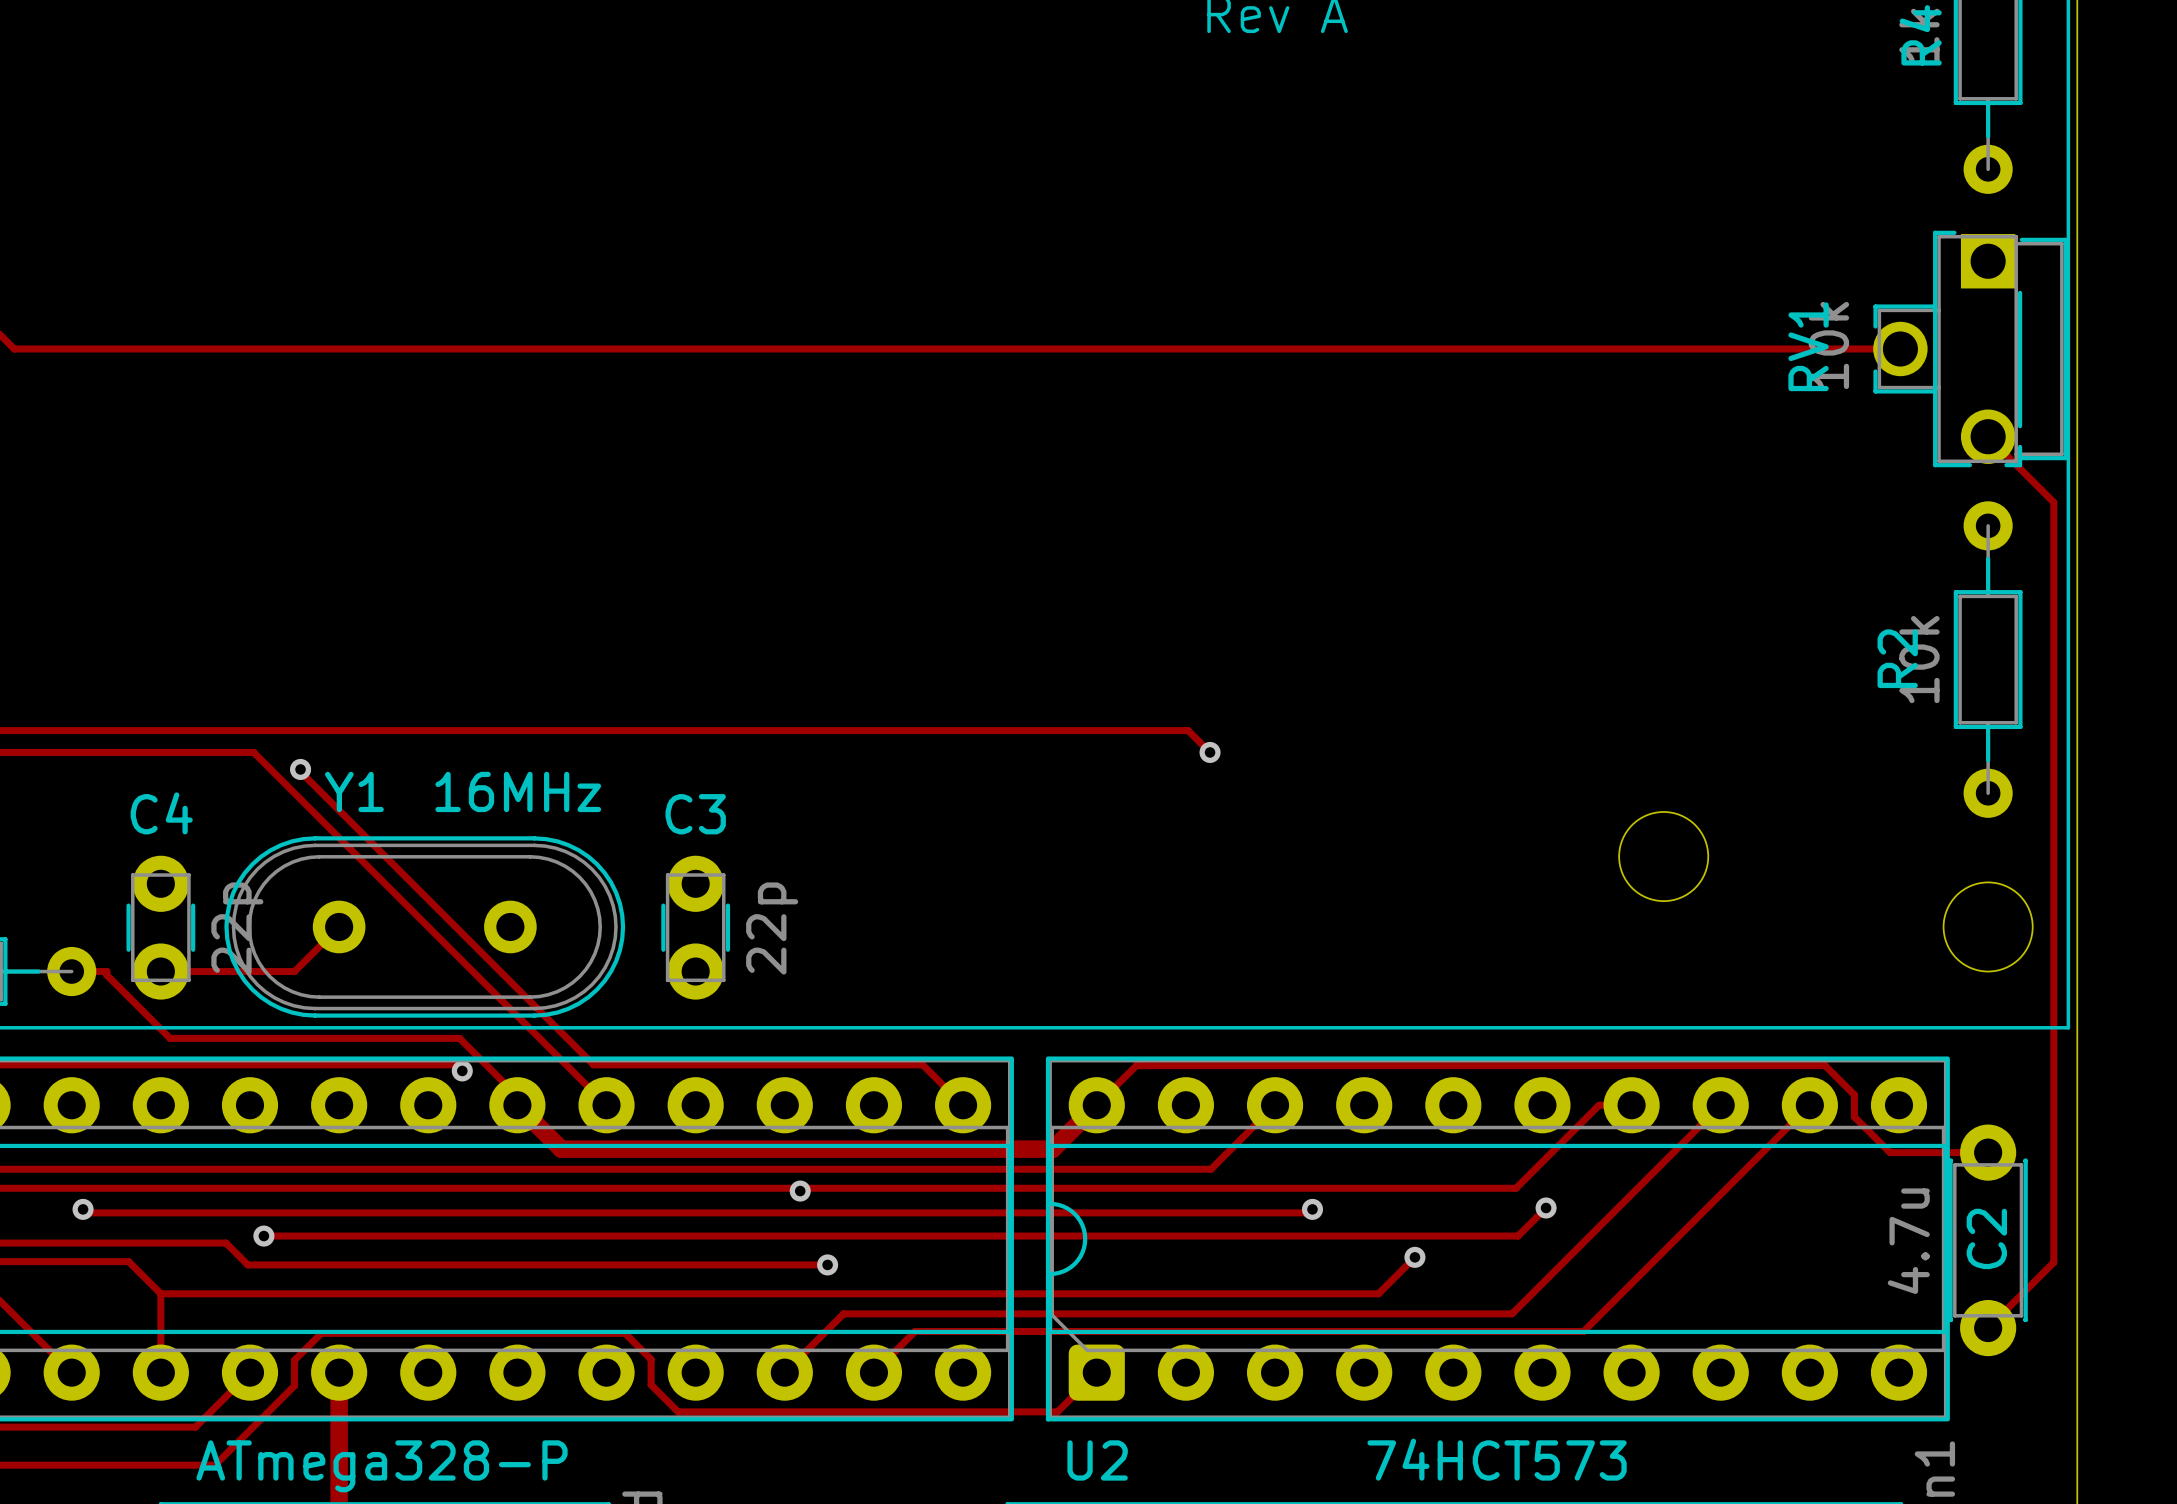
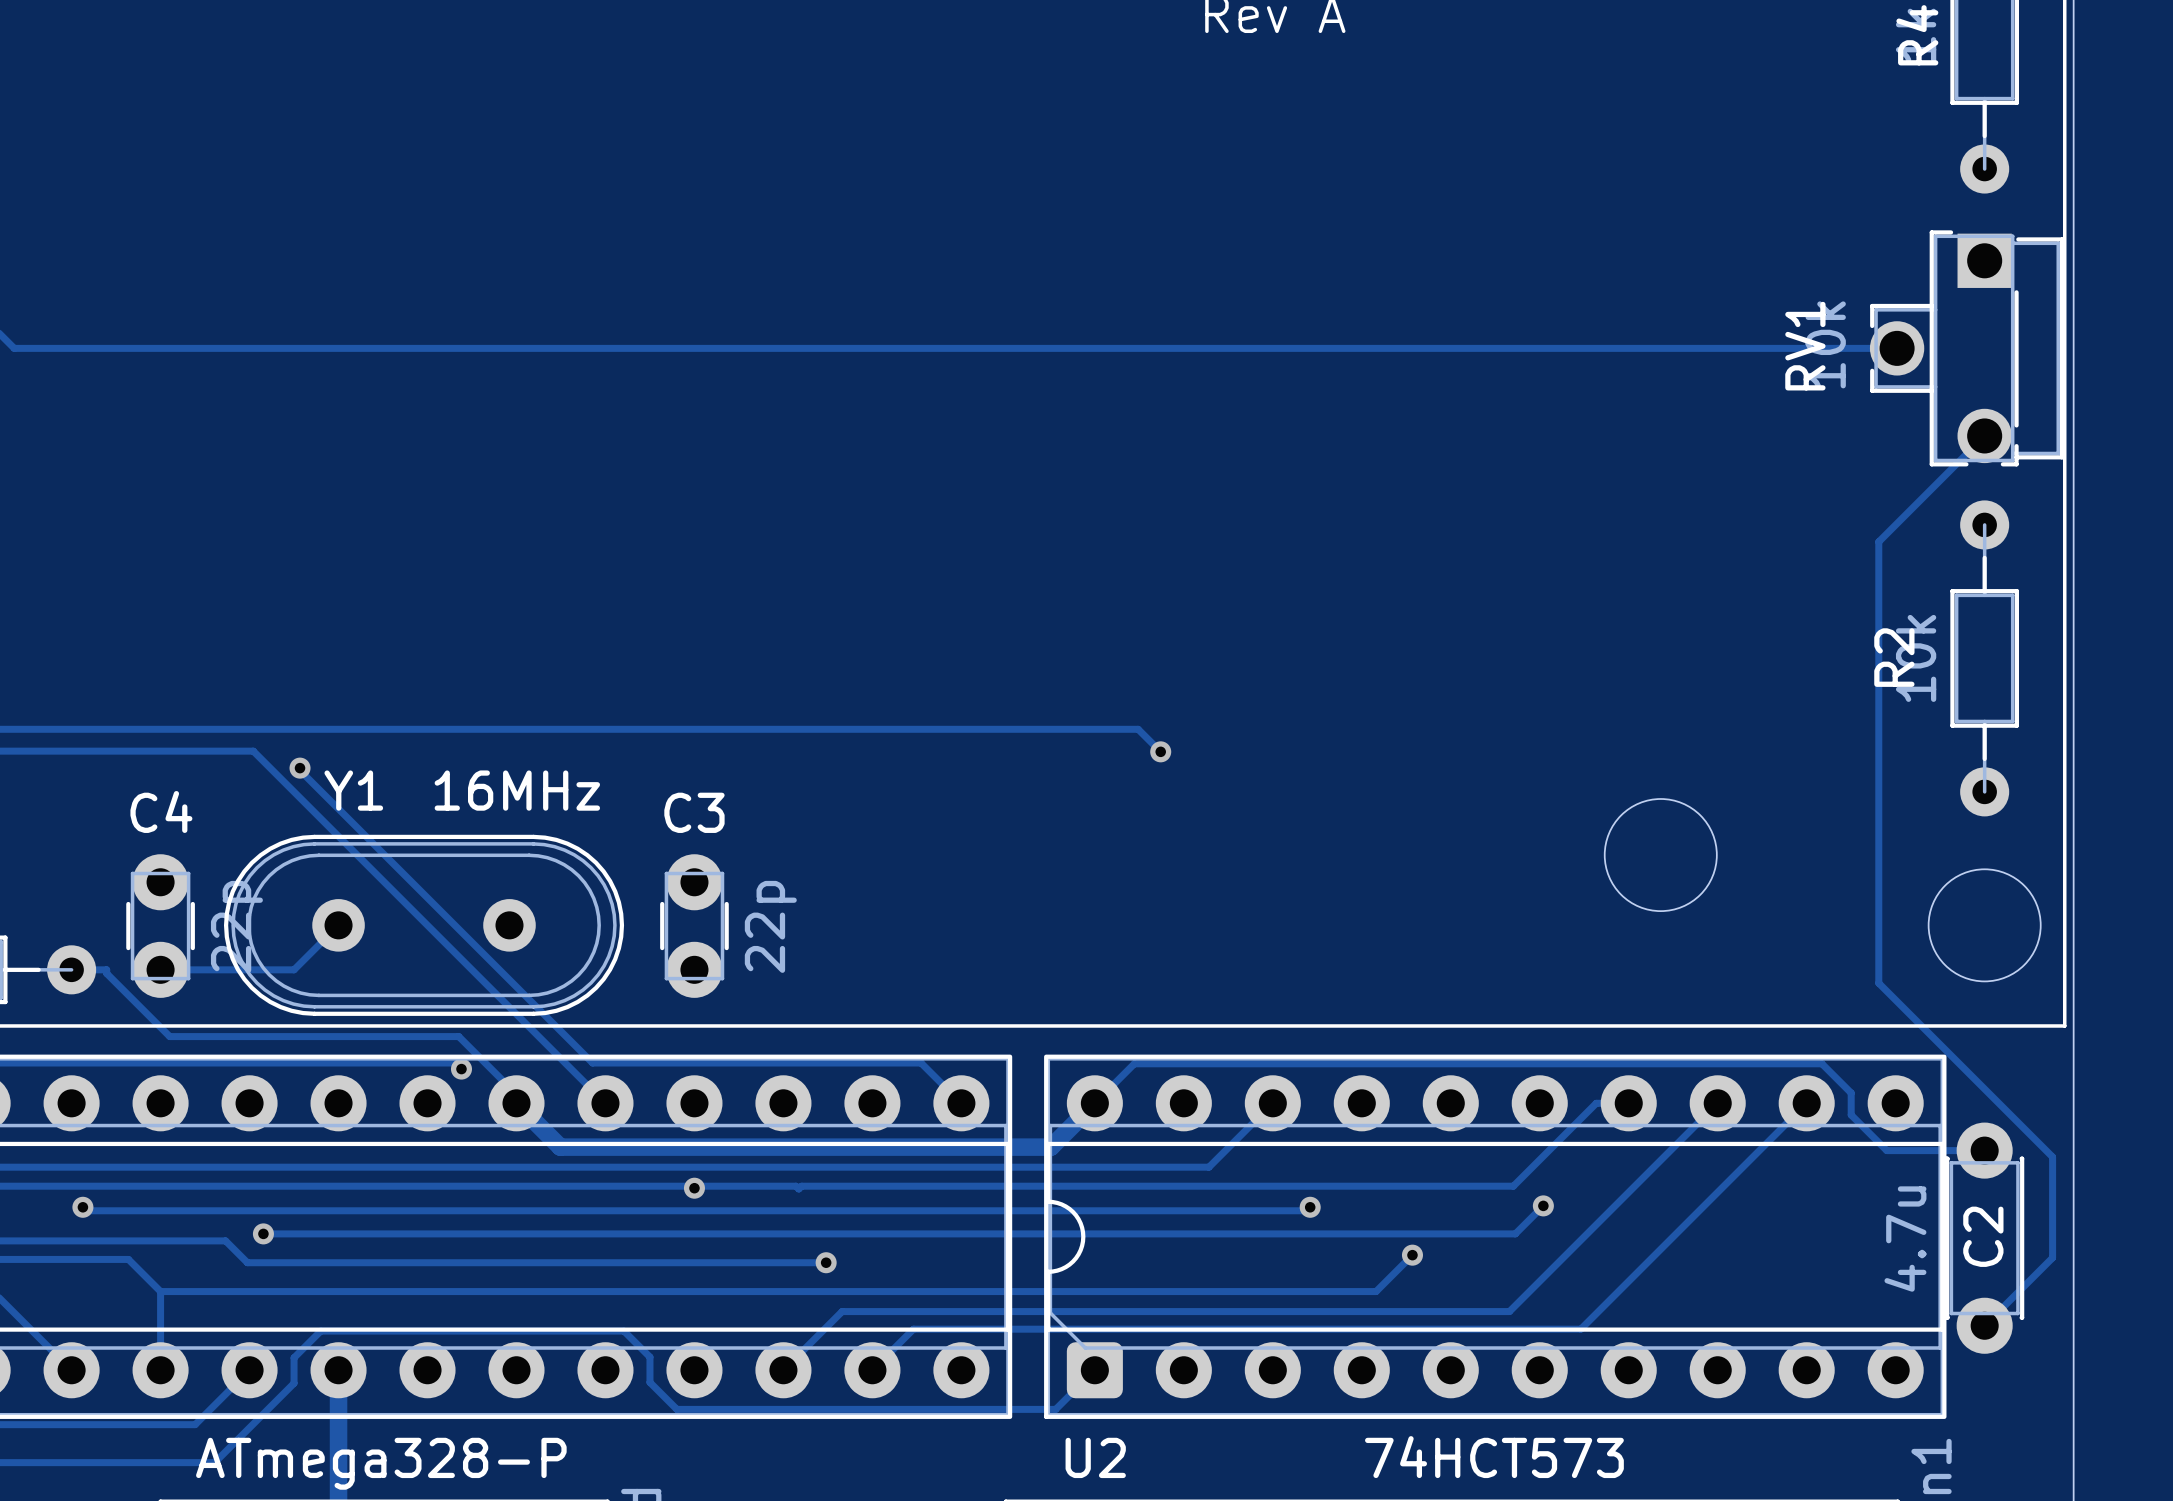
track: (1988, 436) (2053, 502) (2053, 1262) -> (1984, 435) (1878, 541) (1878, 983) (2052, 1157) (2052, 1257) (2050, 1260)
track: (1140, 730) (1188, 730) (1210, 752) -> (1138, 729) (1160, 751)
via position: (1210, 752) -> (1160, 751)
round board edge size: [1618, 811, 1710, 903] -> [1603, 798, 1718, 912]
round board edge size: [1942, 881, 2034, 973] -> [1927, 868, 2042, 983]
via position: (800, 1191) -> (694, 1188)

